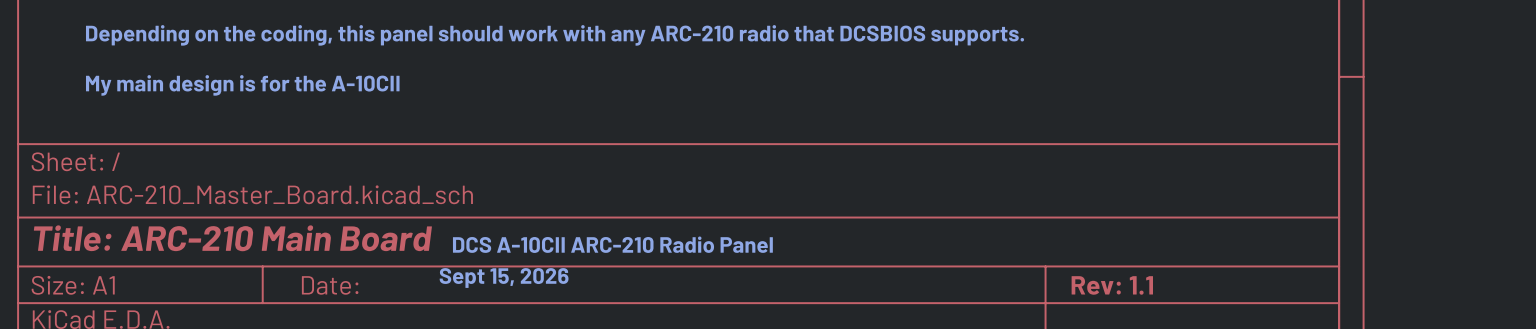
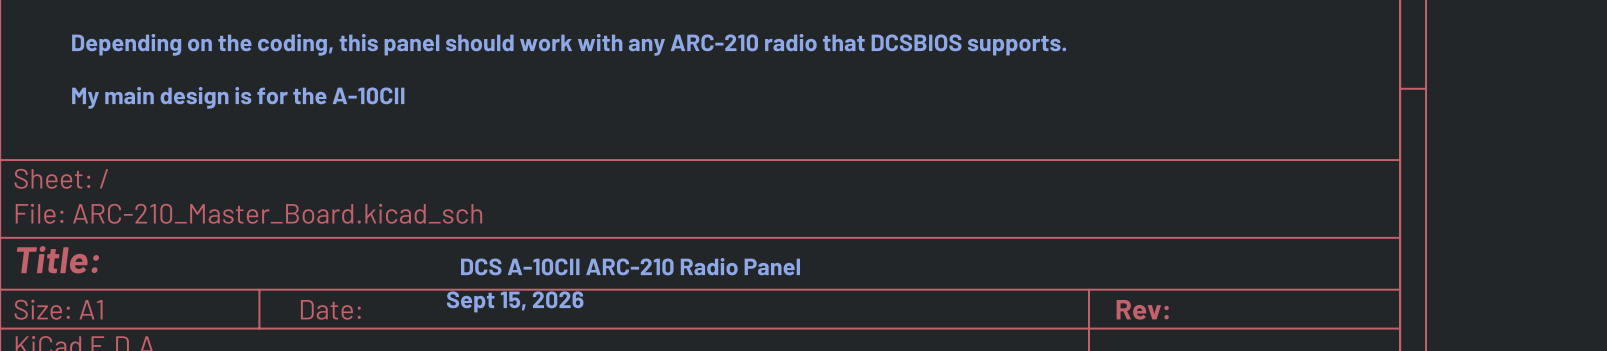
title block: Title: ARC-210 Main Board (232, 238) -> Title: (58, 259)
title block: Rev: 1.1 (1112, 285) -> Rev: (1142, 309)

